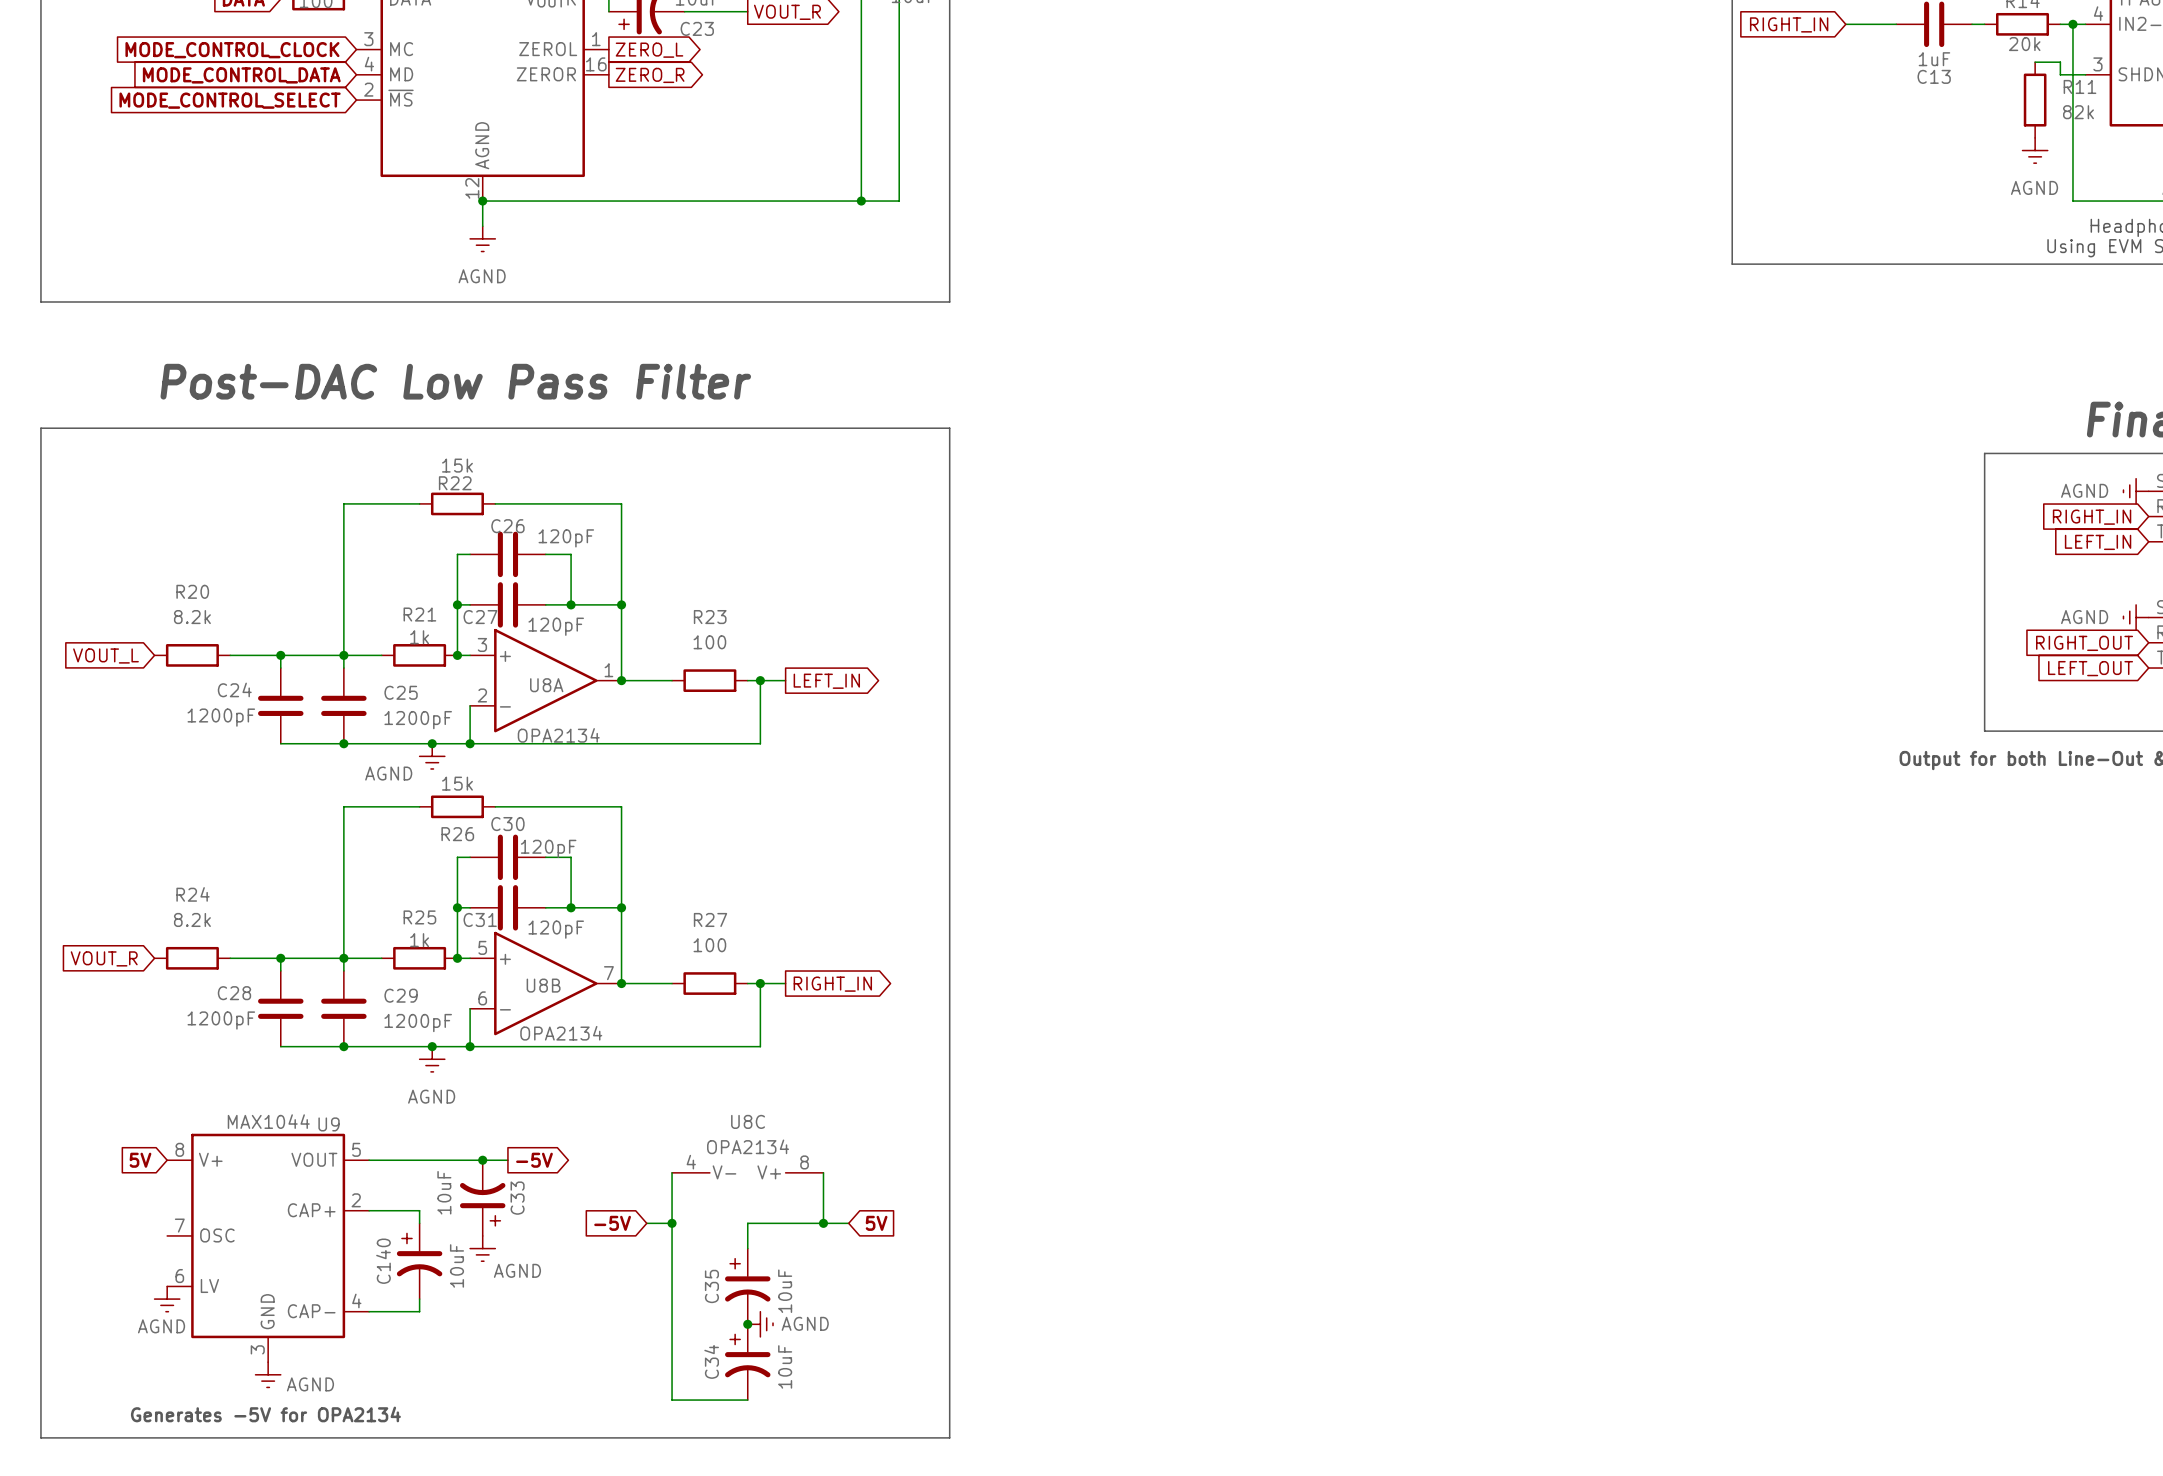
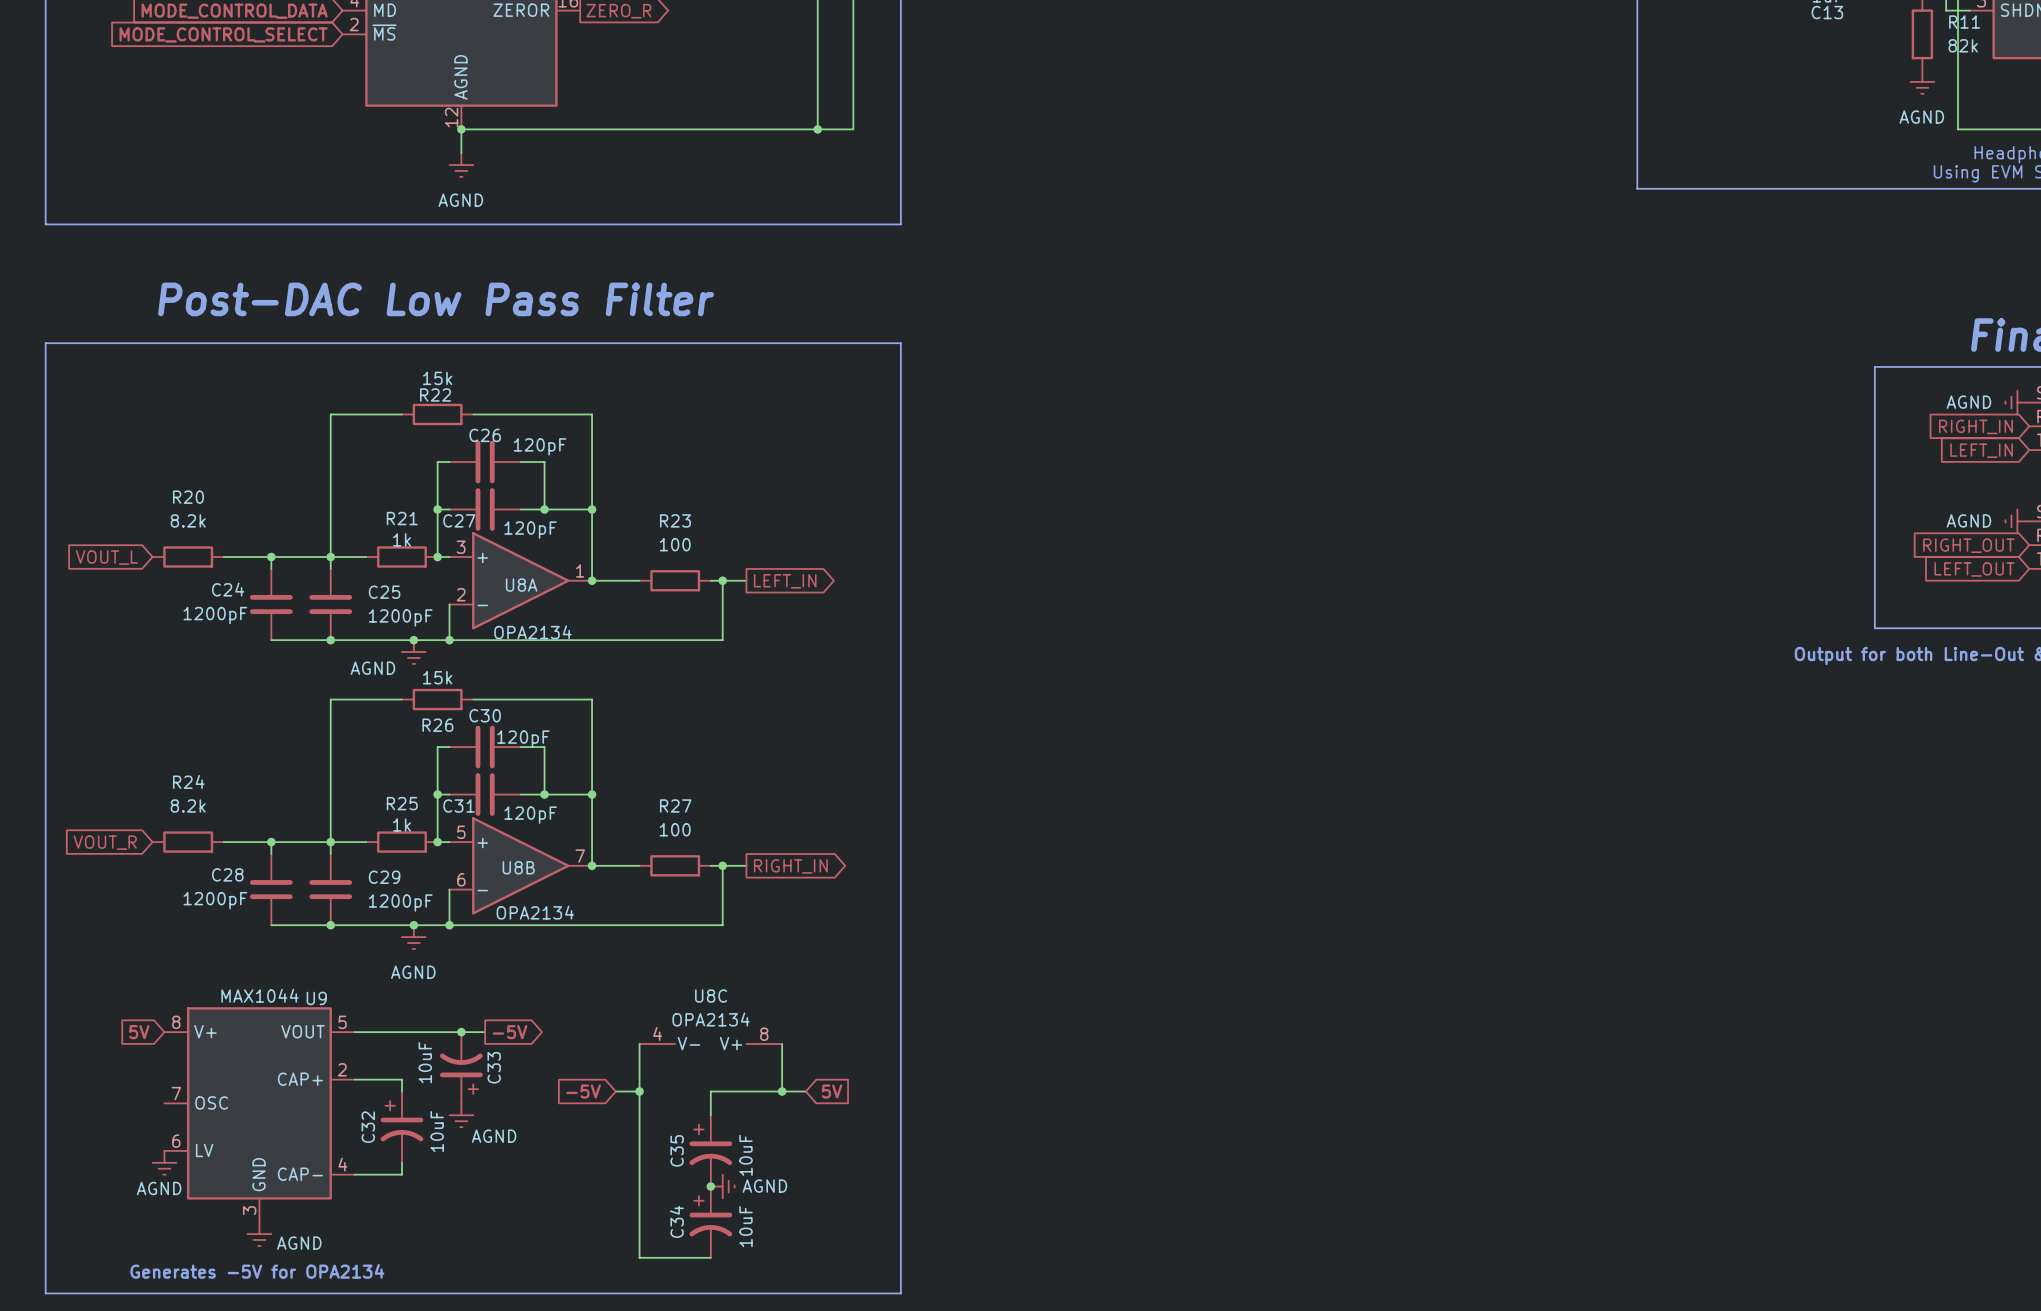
C140 name: C140 (383, 1261) -> C32 (368, 1127)

